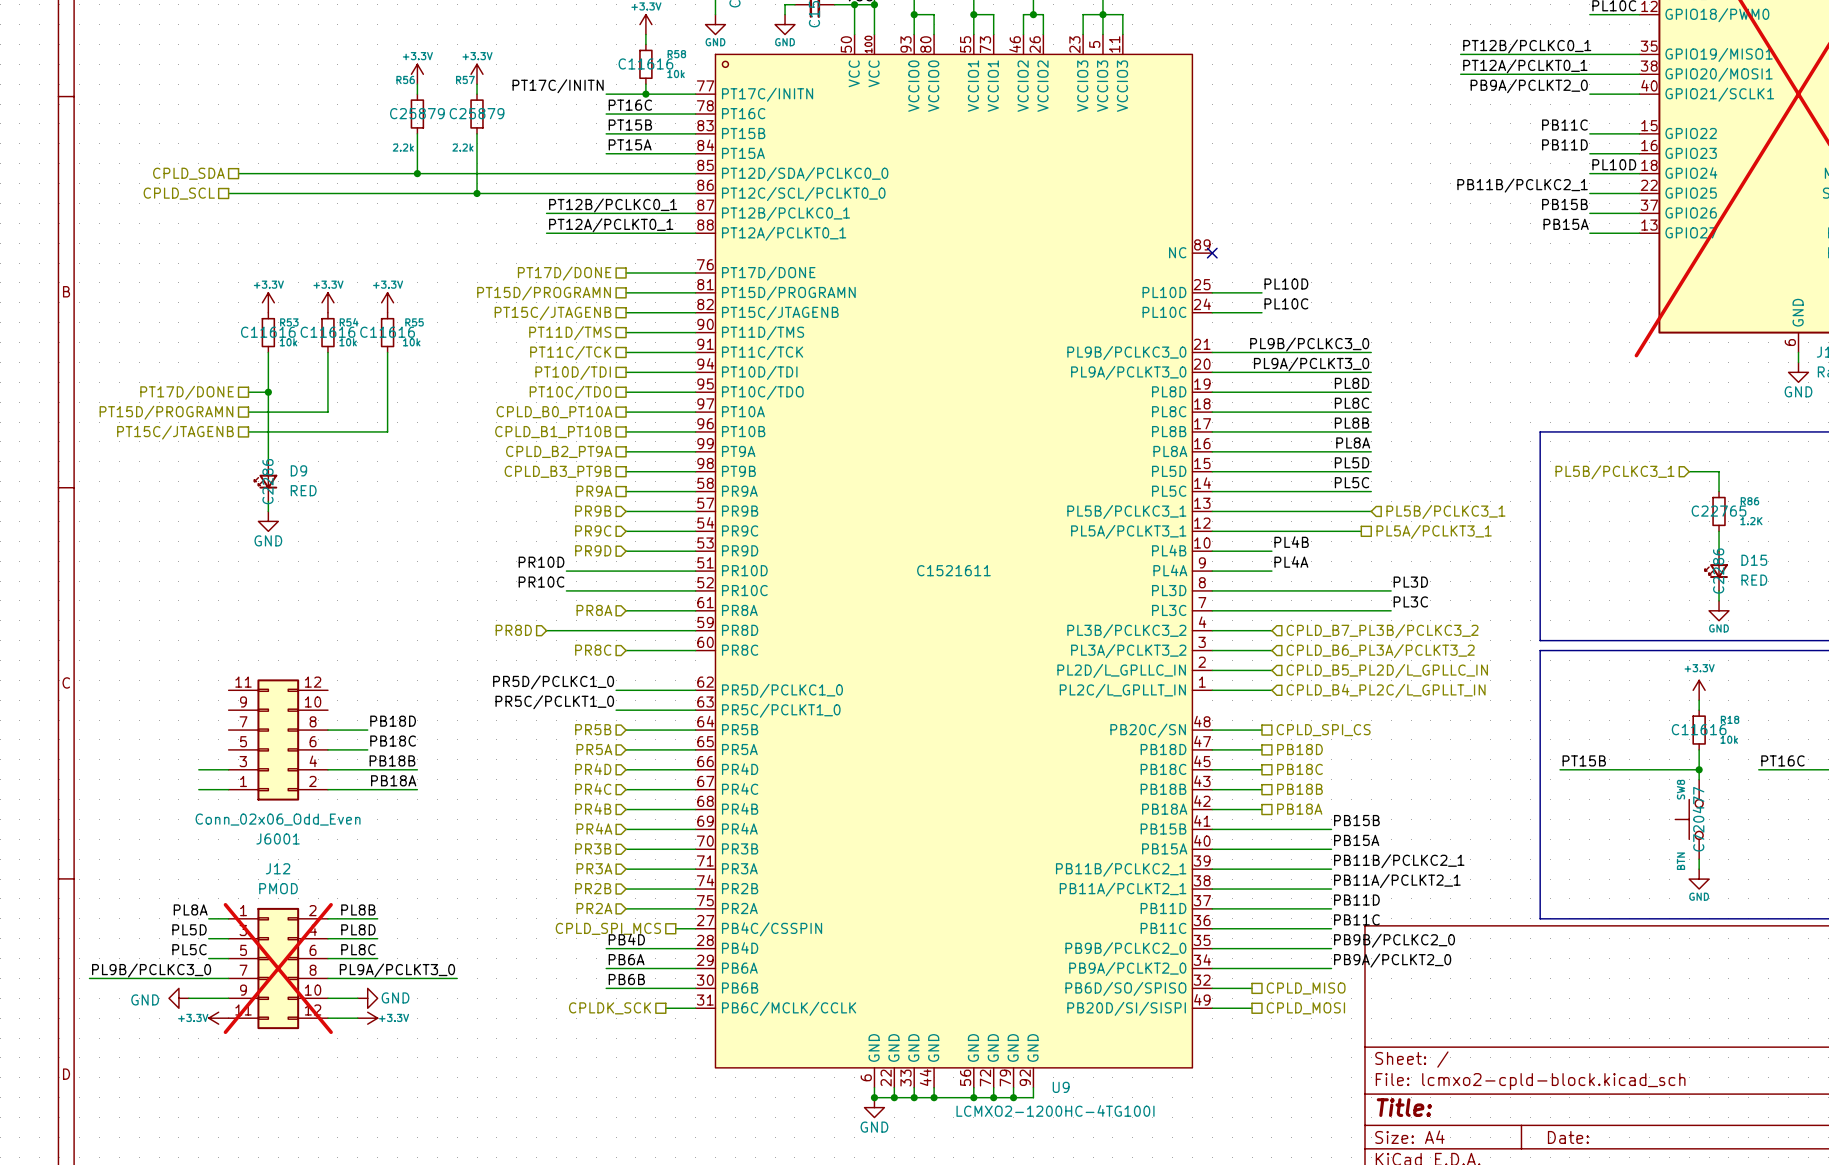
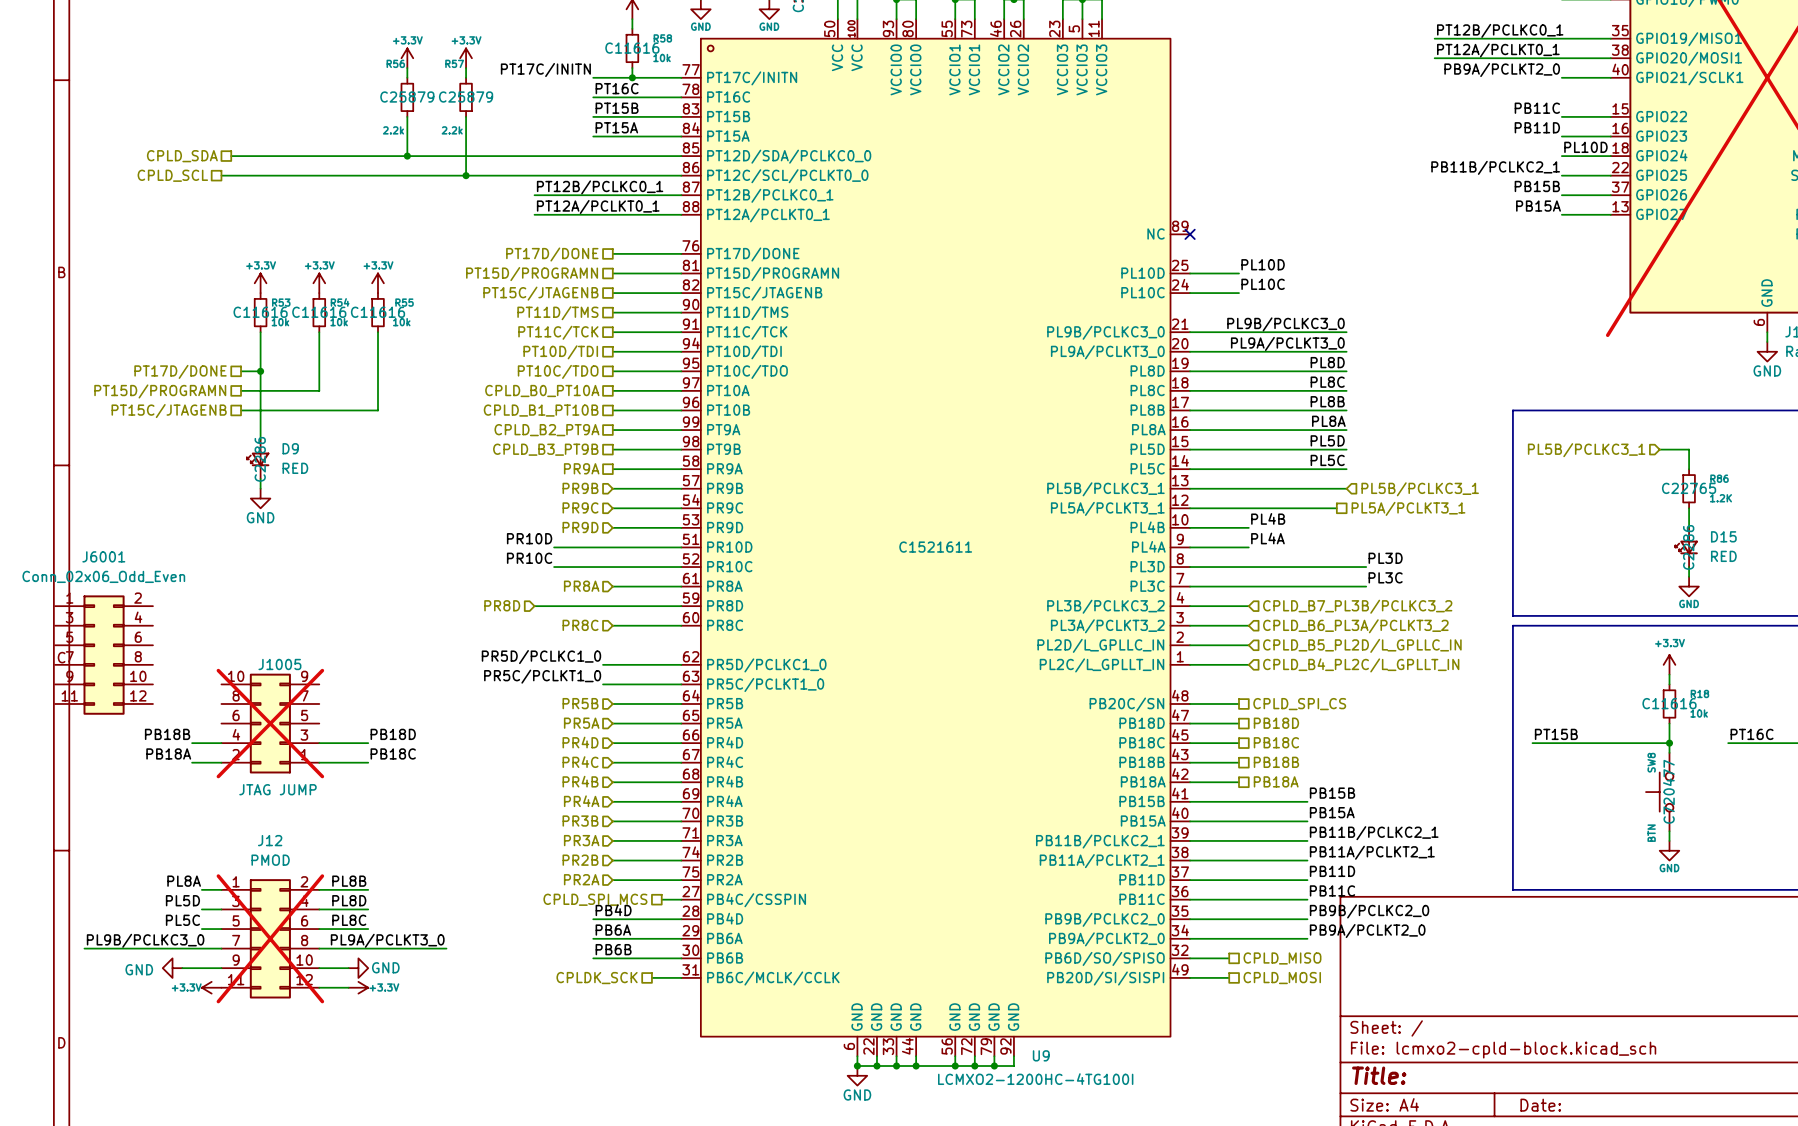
label position: PB18D (393, 721) -> PB18D (393, 734)
wire: (327, 730) (367, 730) -> none
J6001 flip: as is (278, 739) -> up-down (104, 655)
J6001 position: (278, 739) -> (104, 655)
label position: PB18C (393, 741) -> PB18C (393, 753)
J1005: none -> JTAG JUMP (270, 723)
wire: (327, 749) (367, 749) -> none
label: none -> PB18B (167, 734)
label: PB18B (392, 760) -> none
wire: (377, 769) (417, 769) -> none
label: none -> PB18A (168, 753)
label: PB18A (393, 780) -> none
wire: (377, 789) (417, 789) -> none

